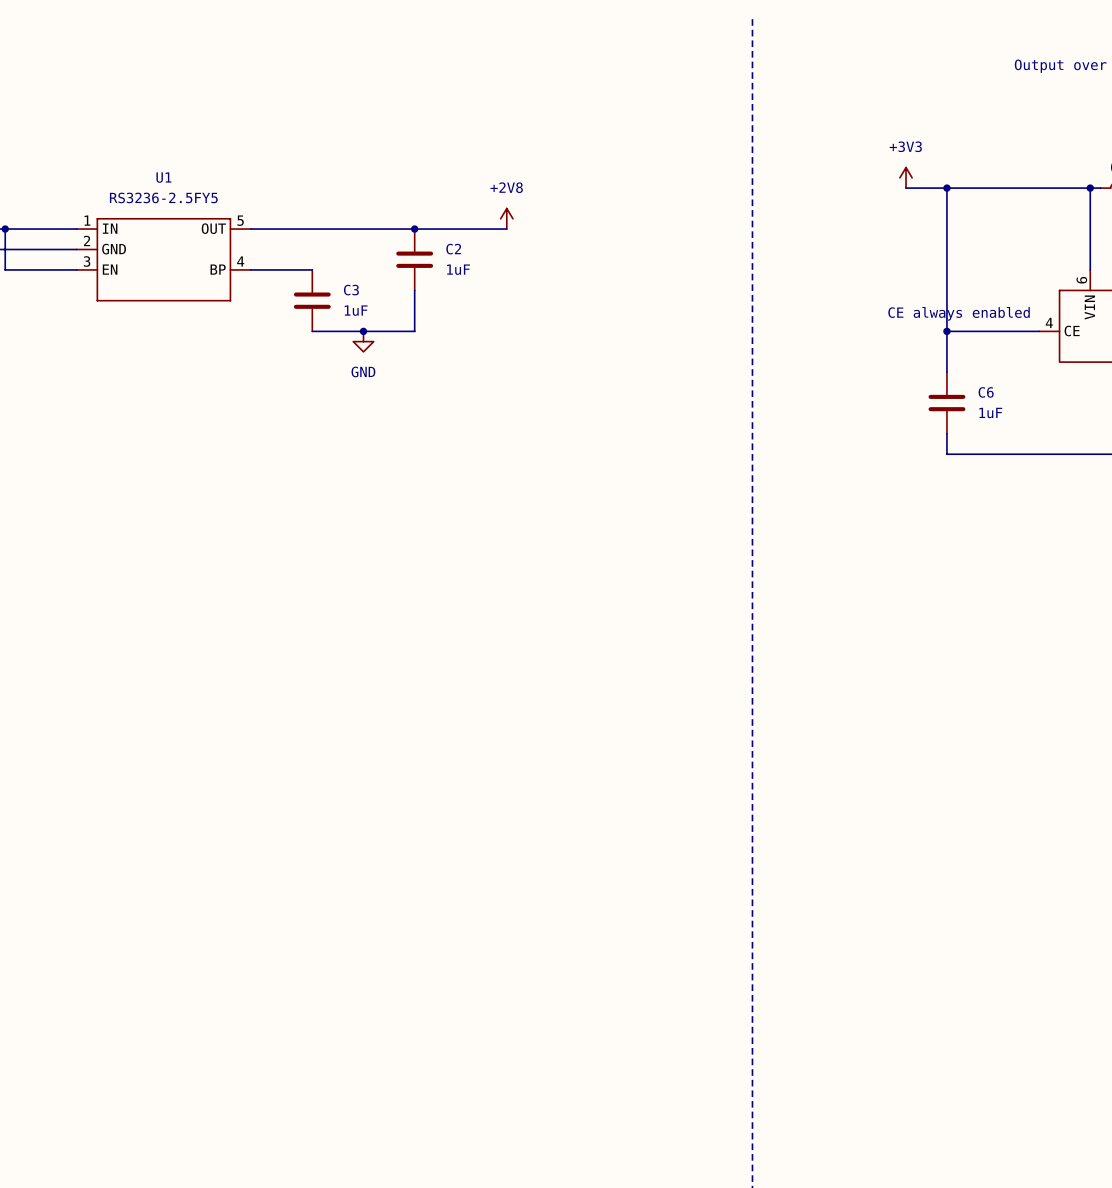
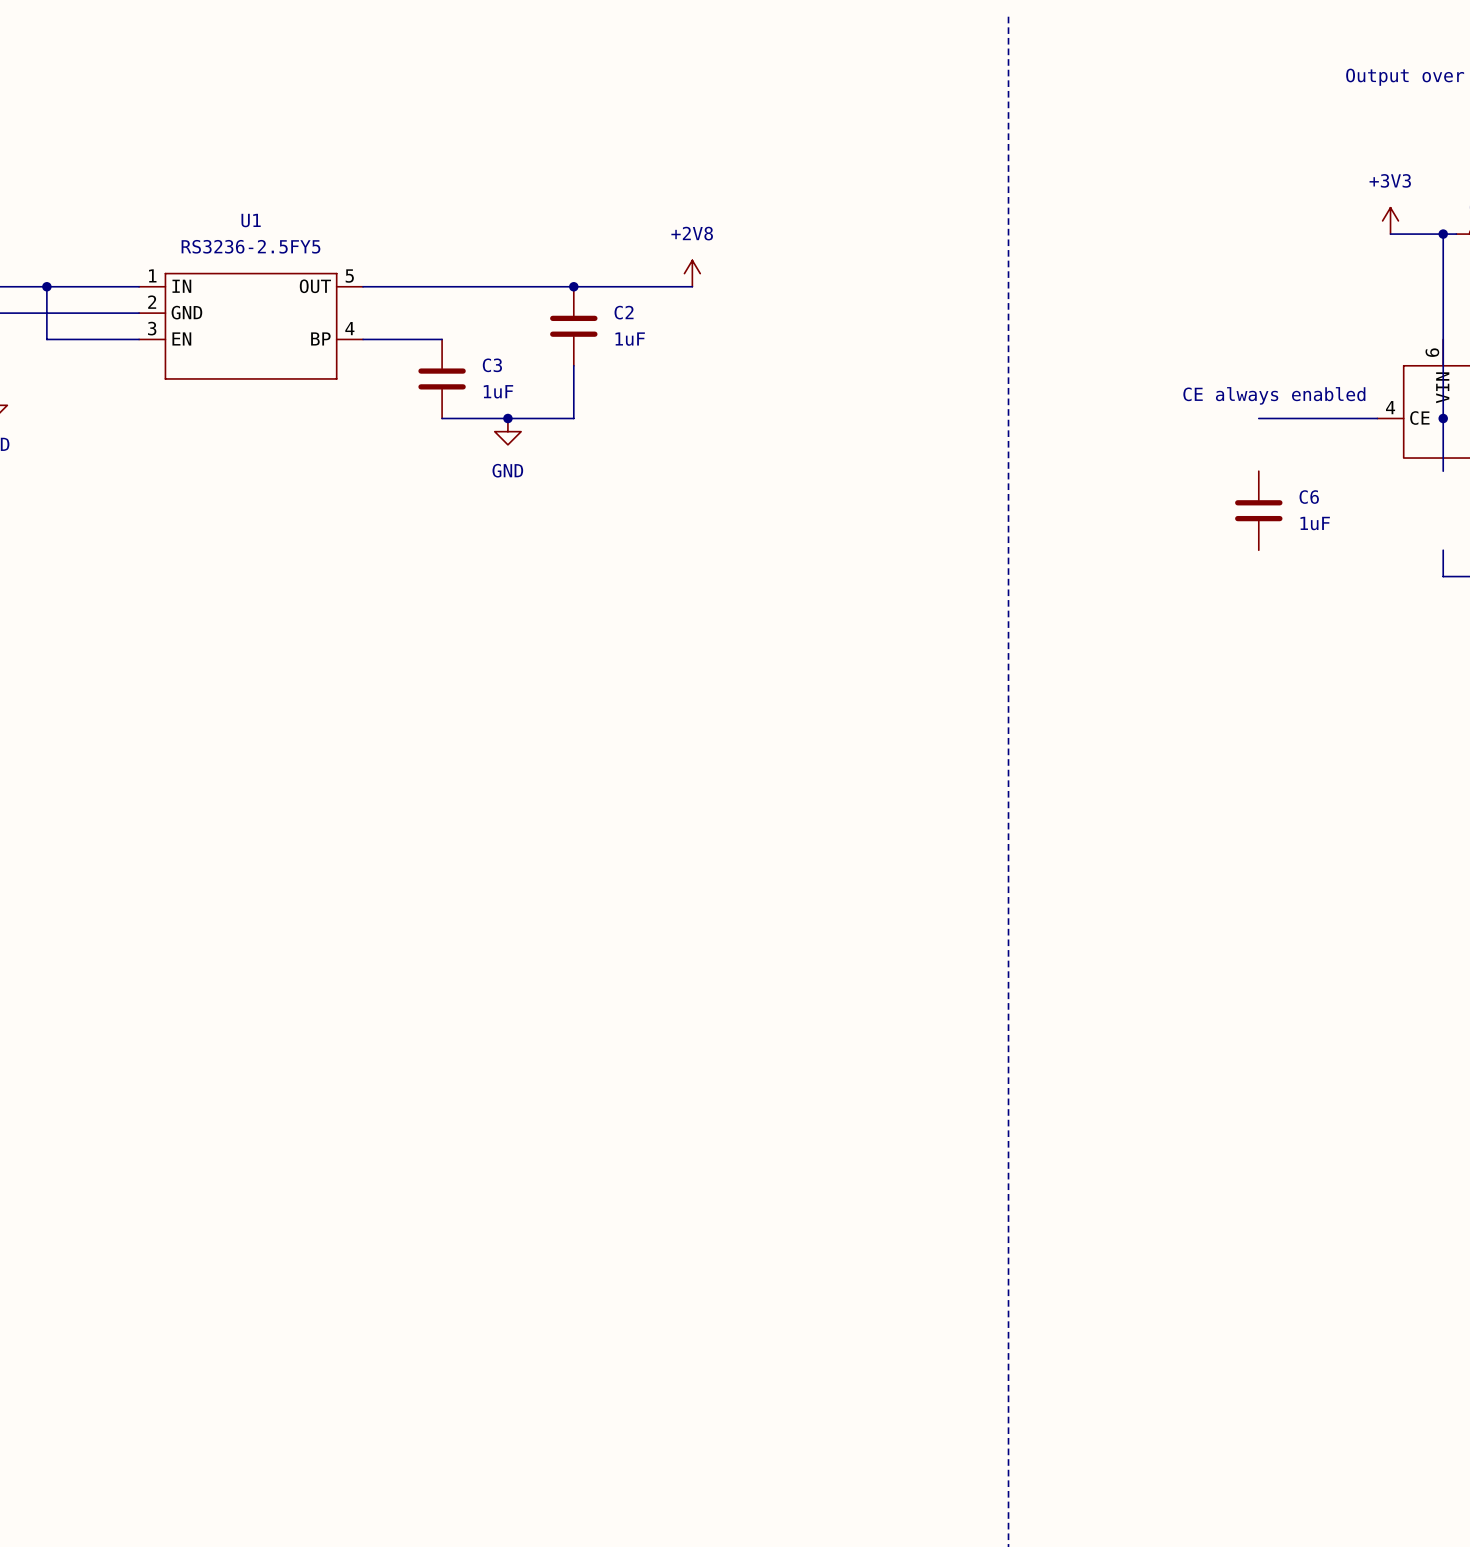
power symbol position: +3V3 (906, 177) -> +3V3 (1390, 220)
wire: (906, 188) (1049, 188) -> none
wire: (946, 188) (946, 372) -> none
junction: (946, 188) -> none
wire: none -> (1443, 339) (1443, 471)
junction: (946, 331) -> none
junction: none -> (1443, 418)
wire: (946, 433) (946, 454) (1090, 454) -> (1443, 550) (1443, 576)

